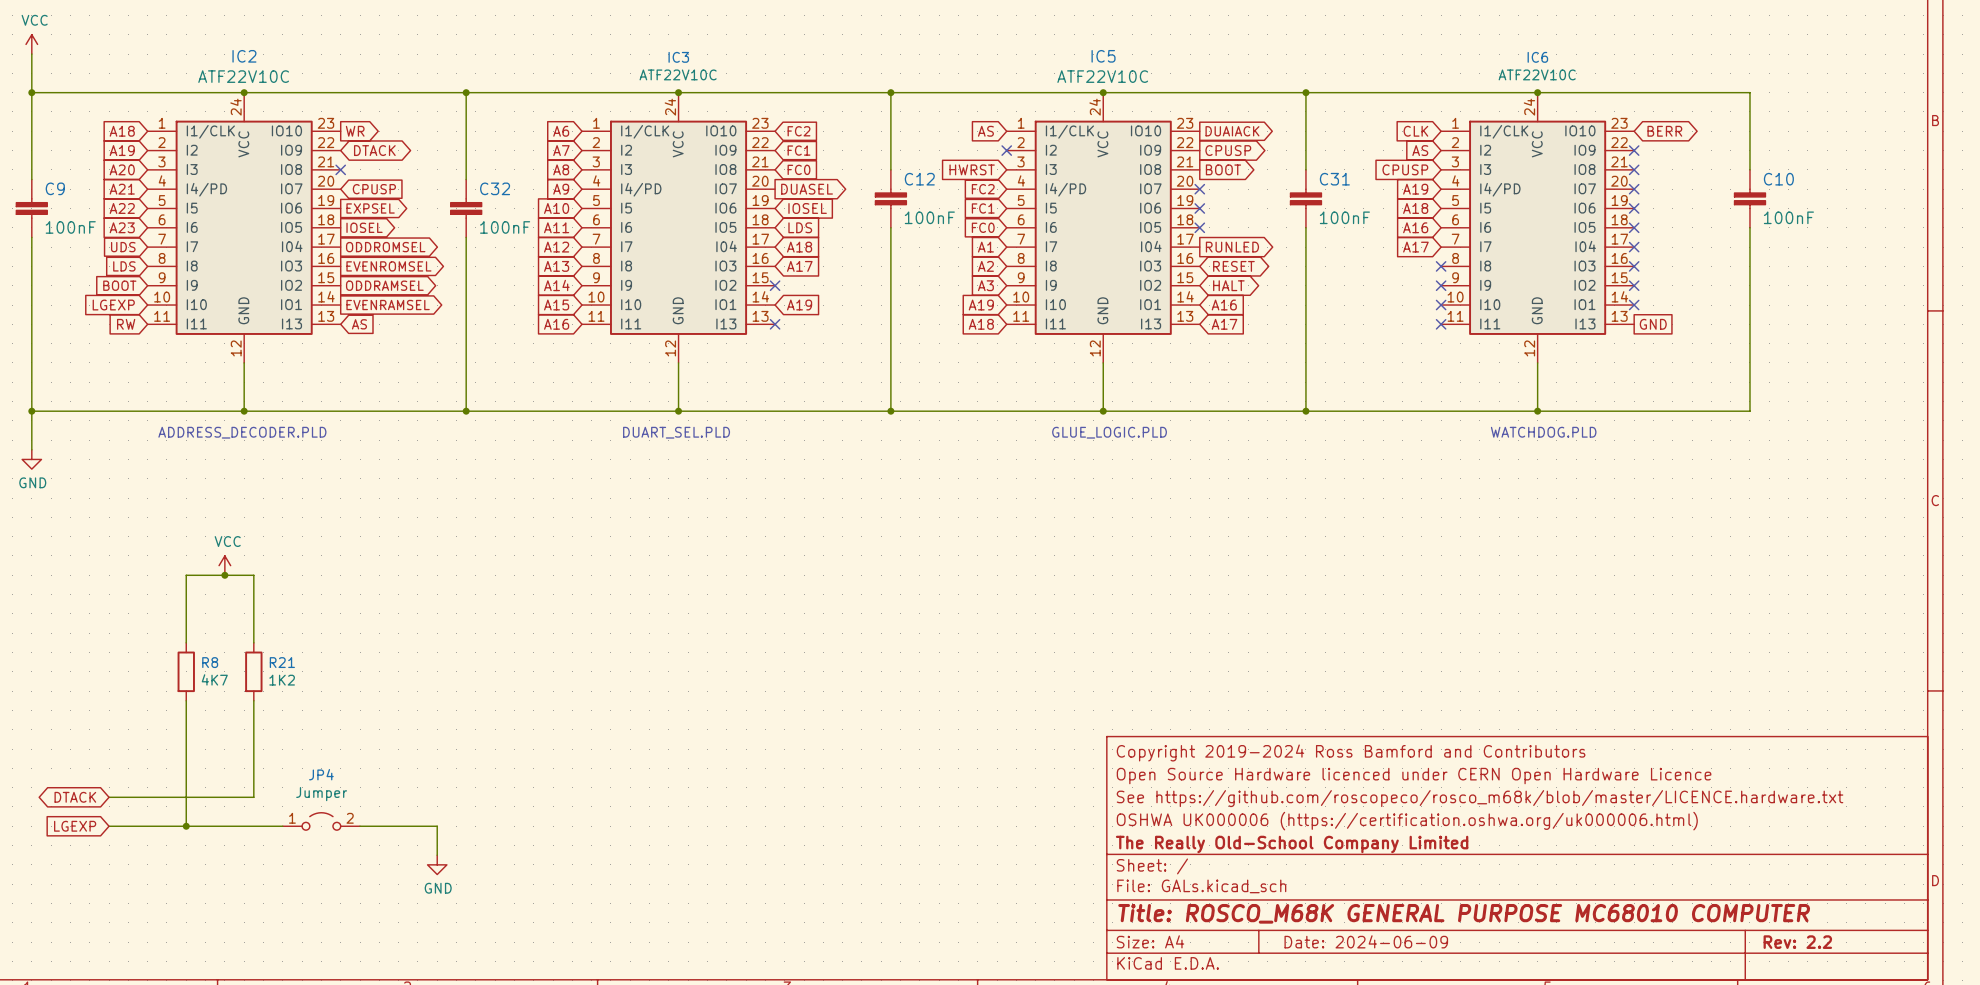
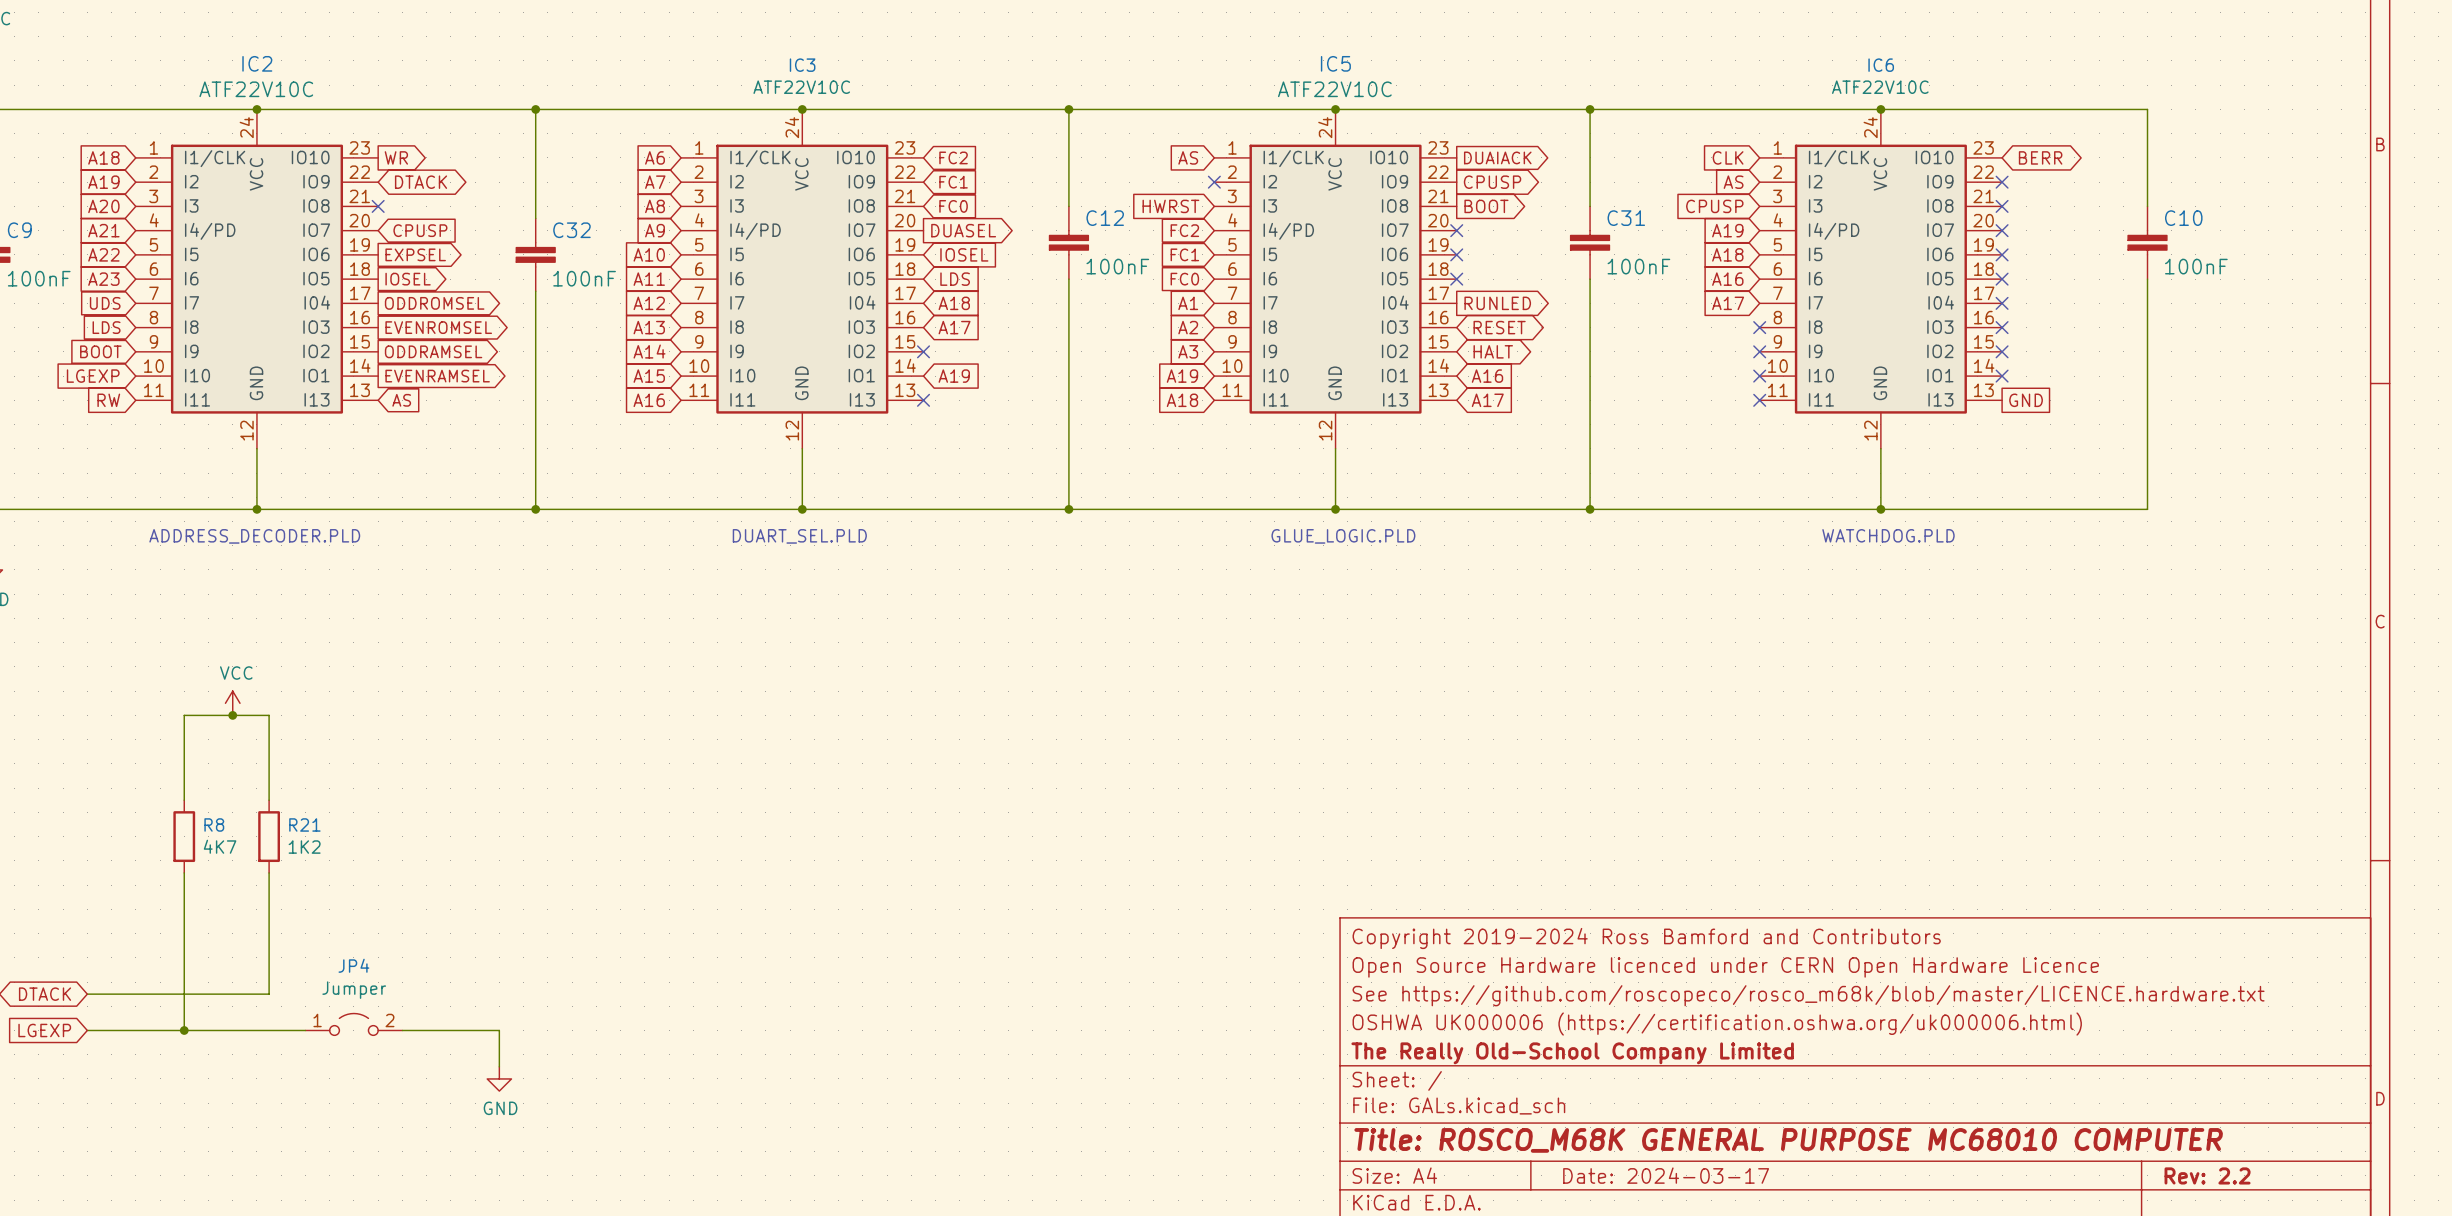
title block: Date: 2024-06-09 (1366, 941) -> Date: 2024-03-17 (1666, 1175)

